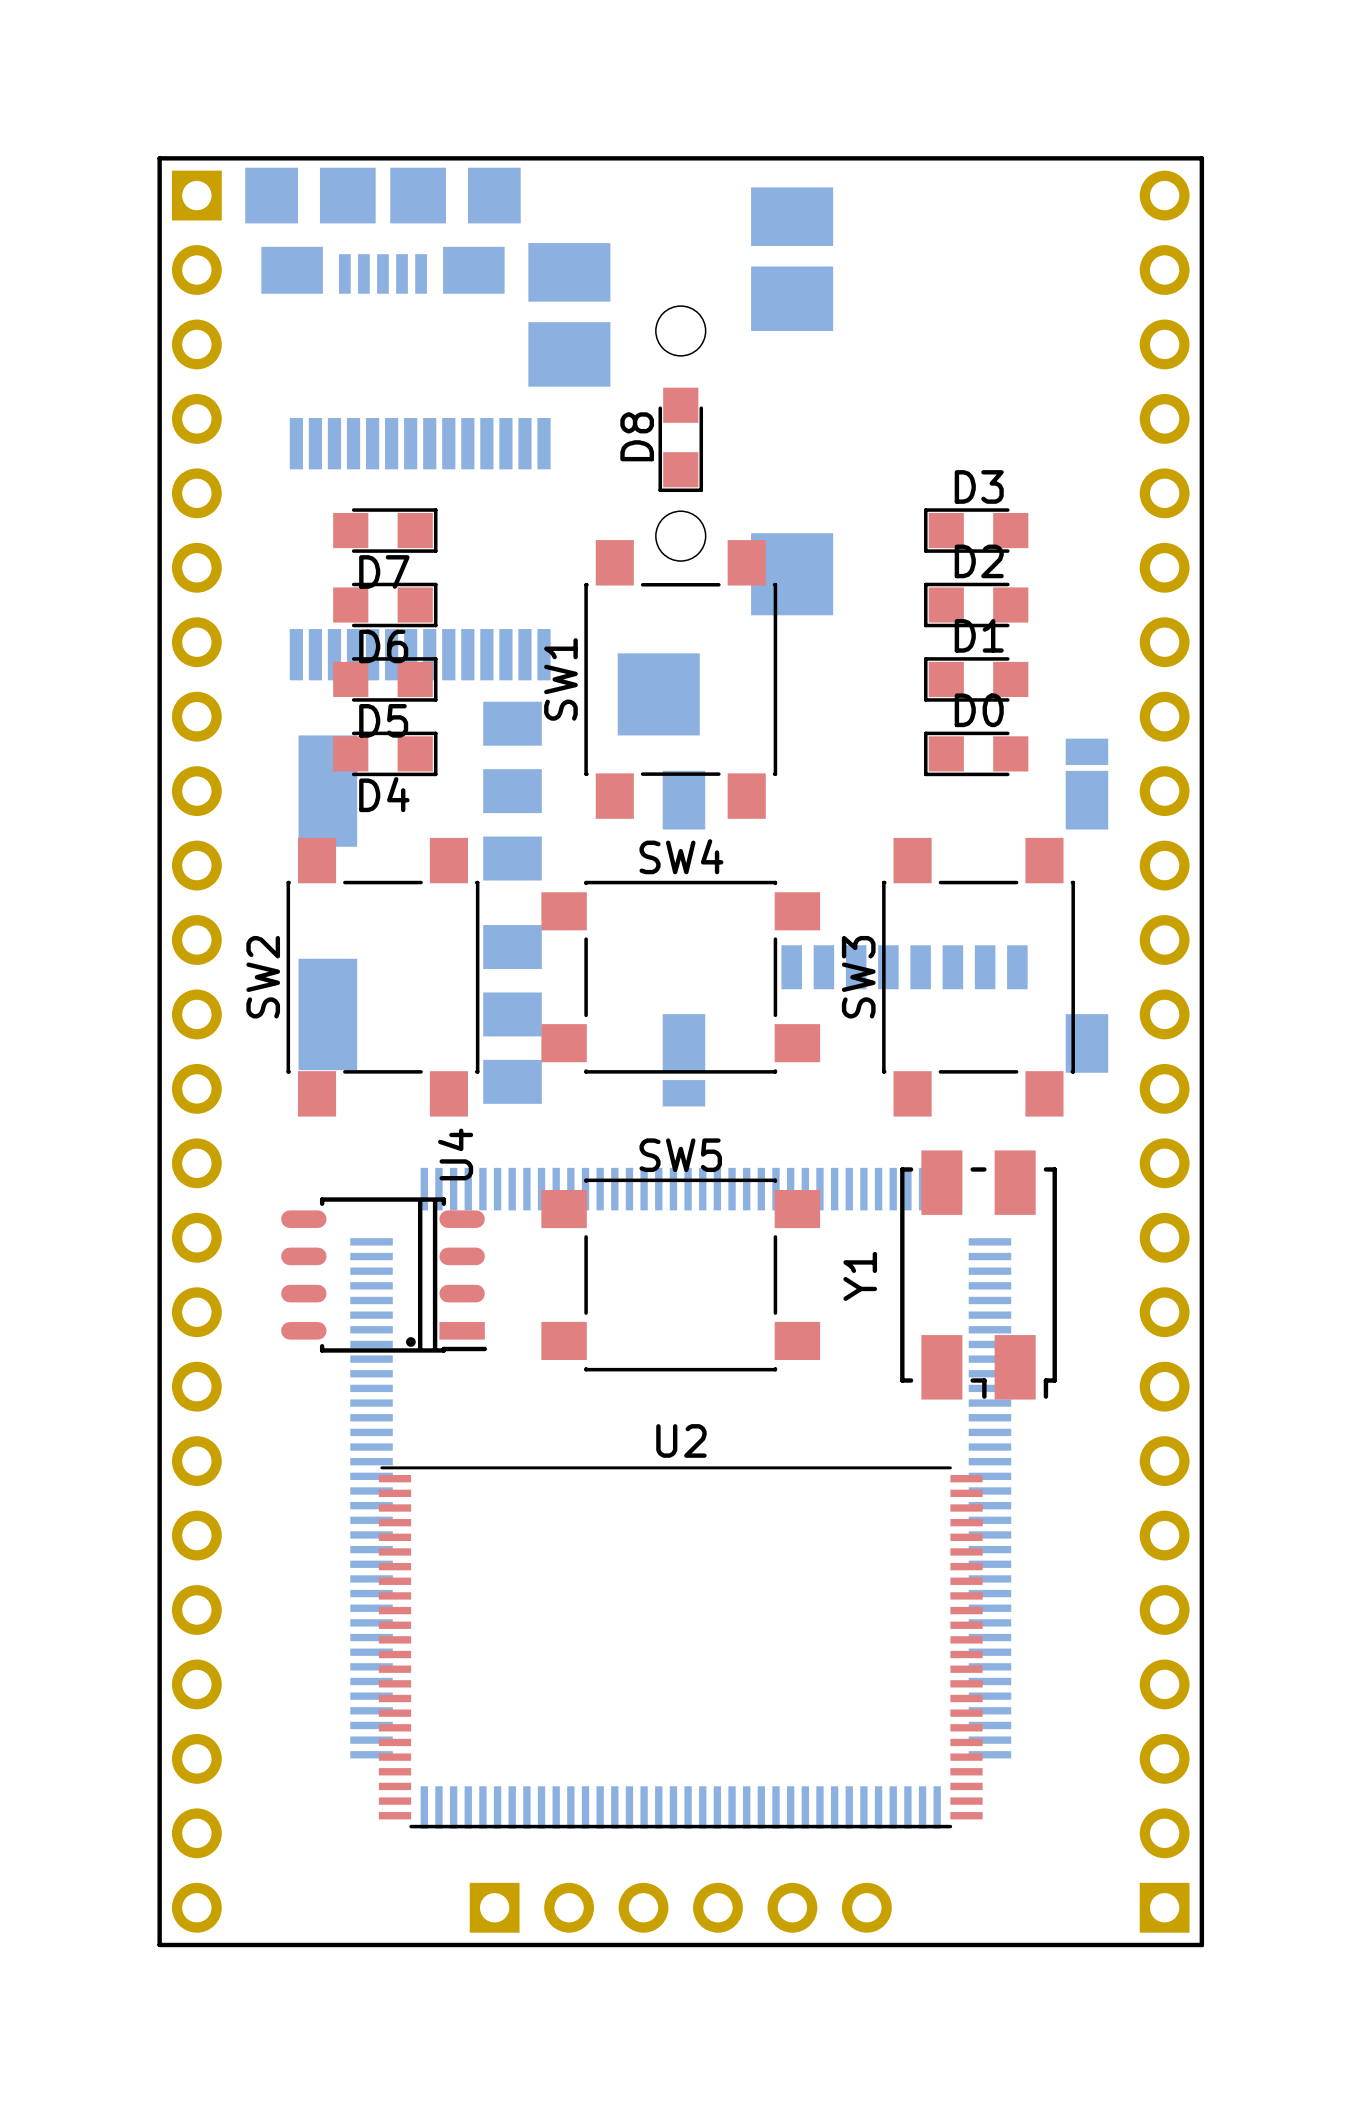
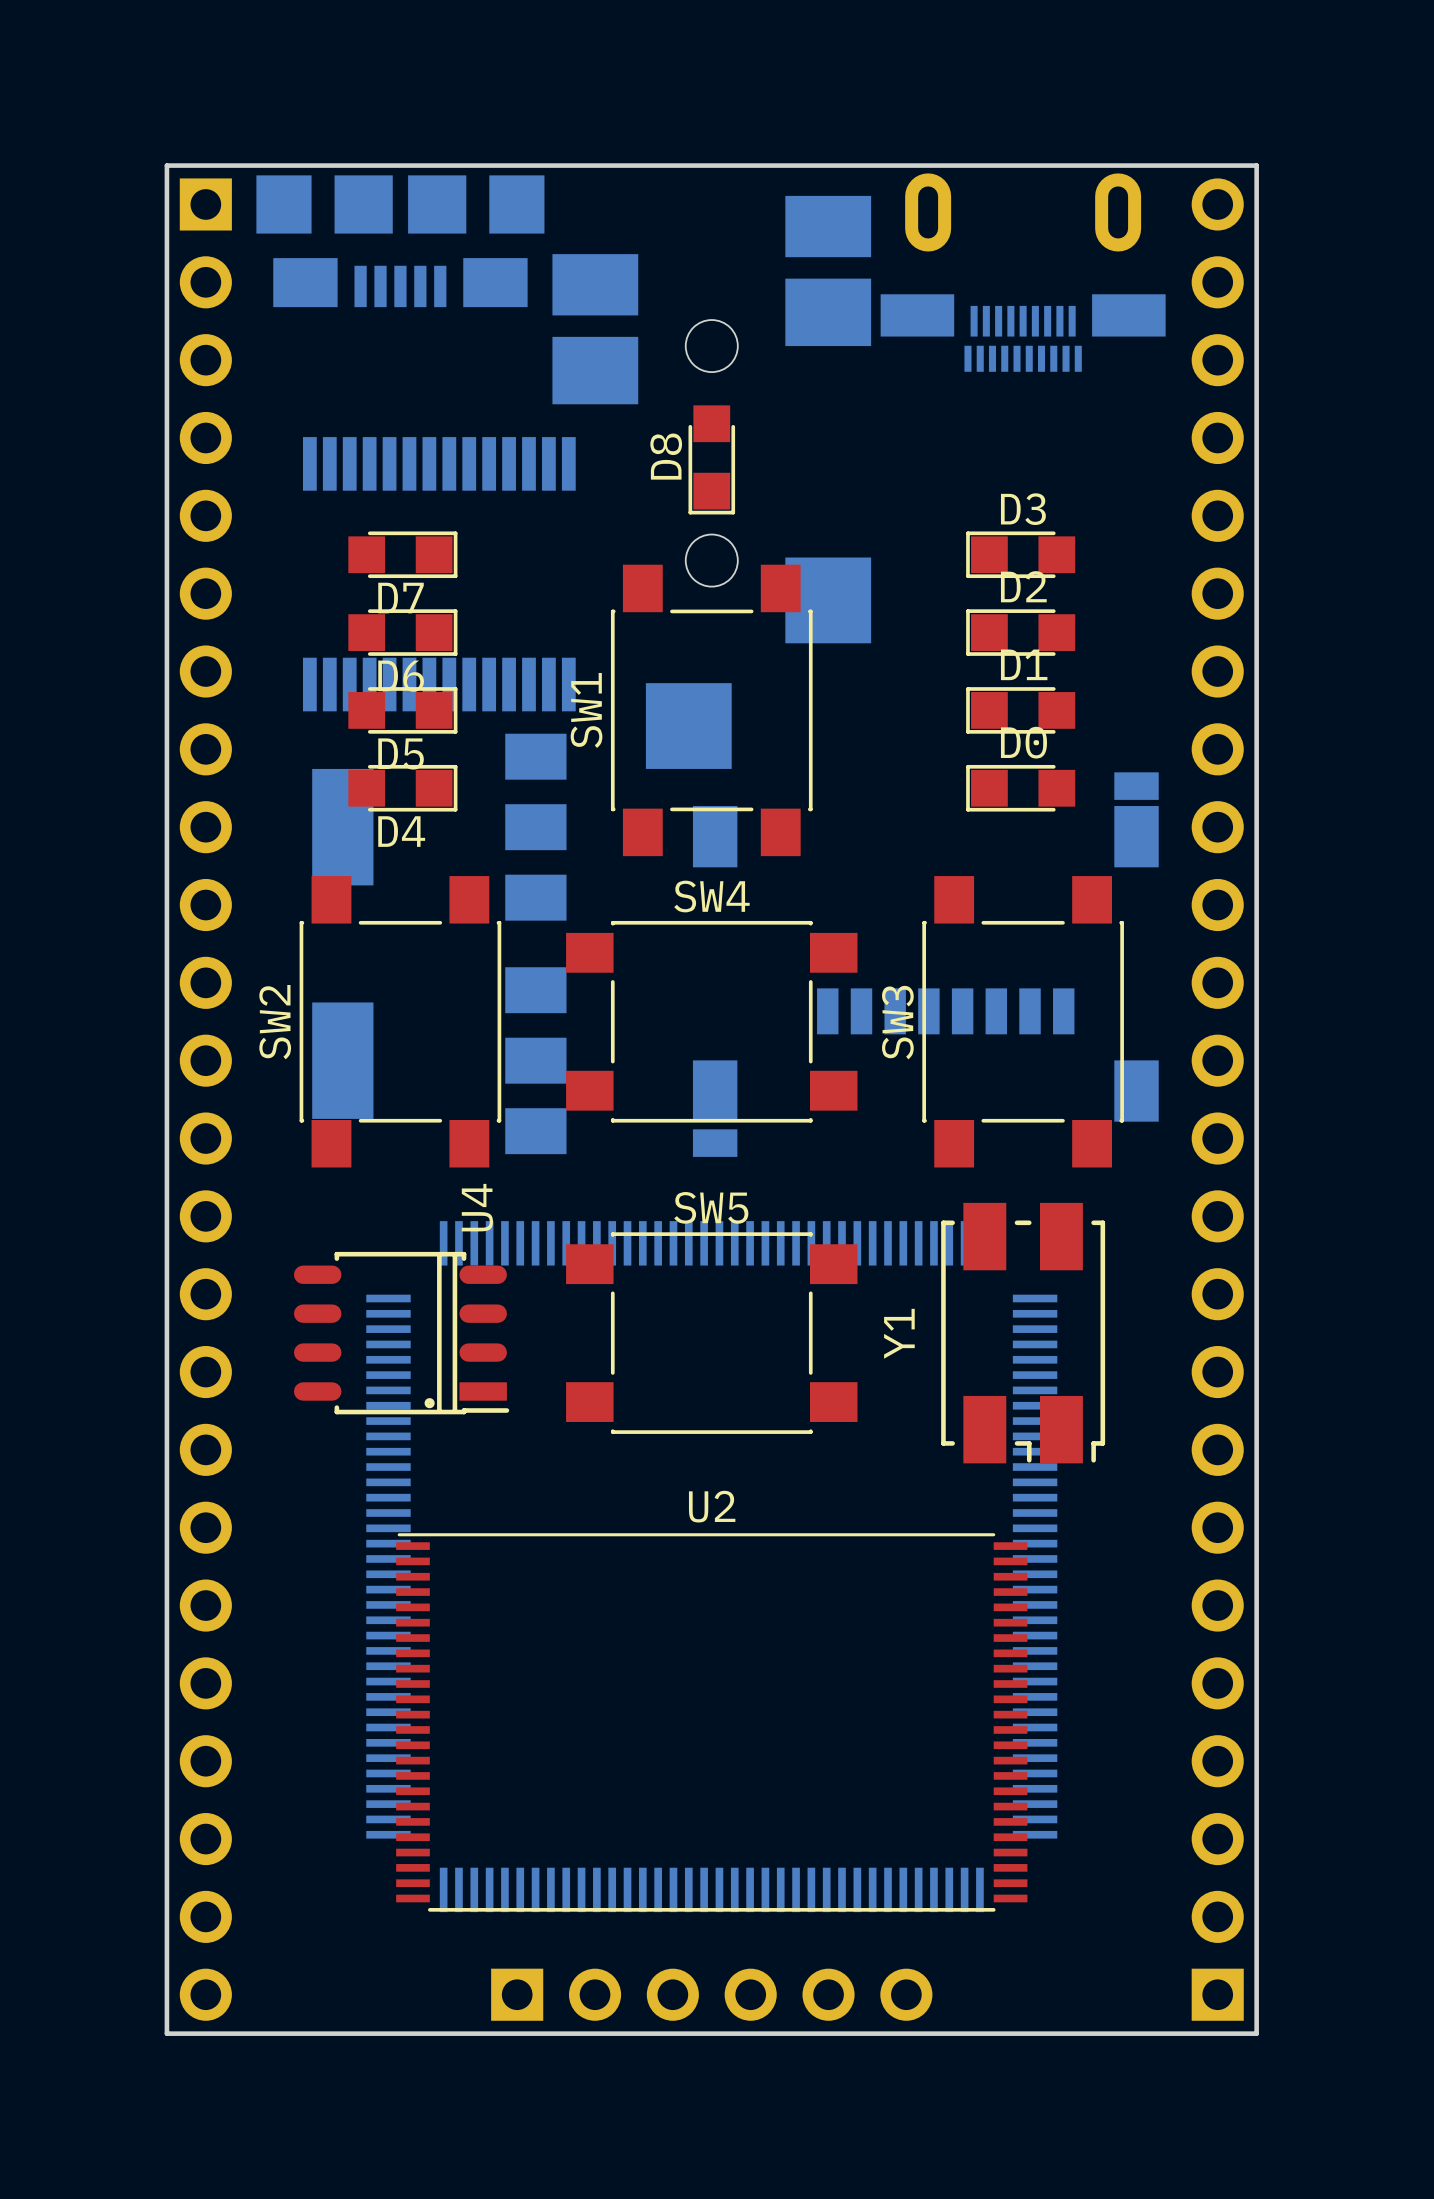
part: none -> (1023, 272)

